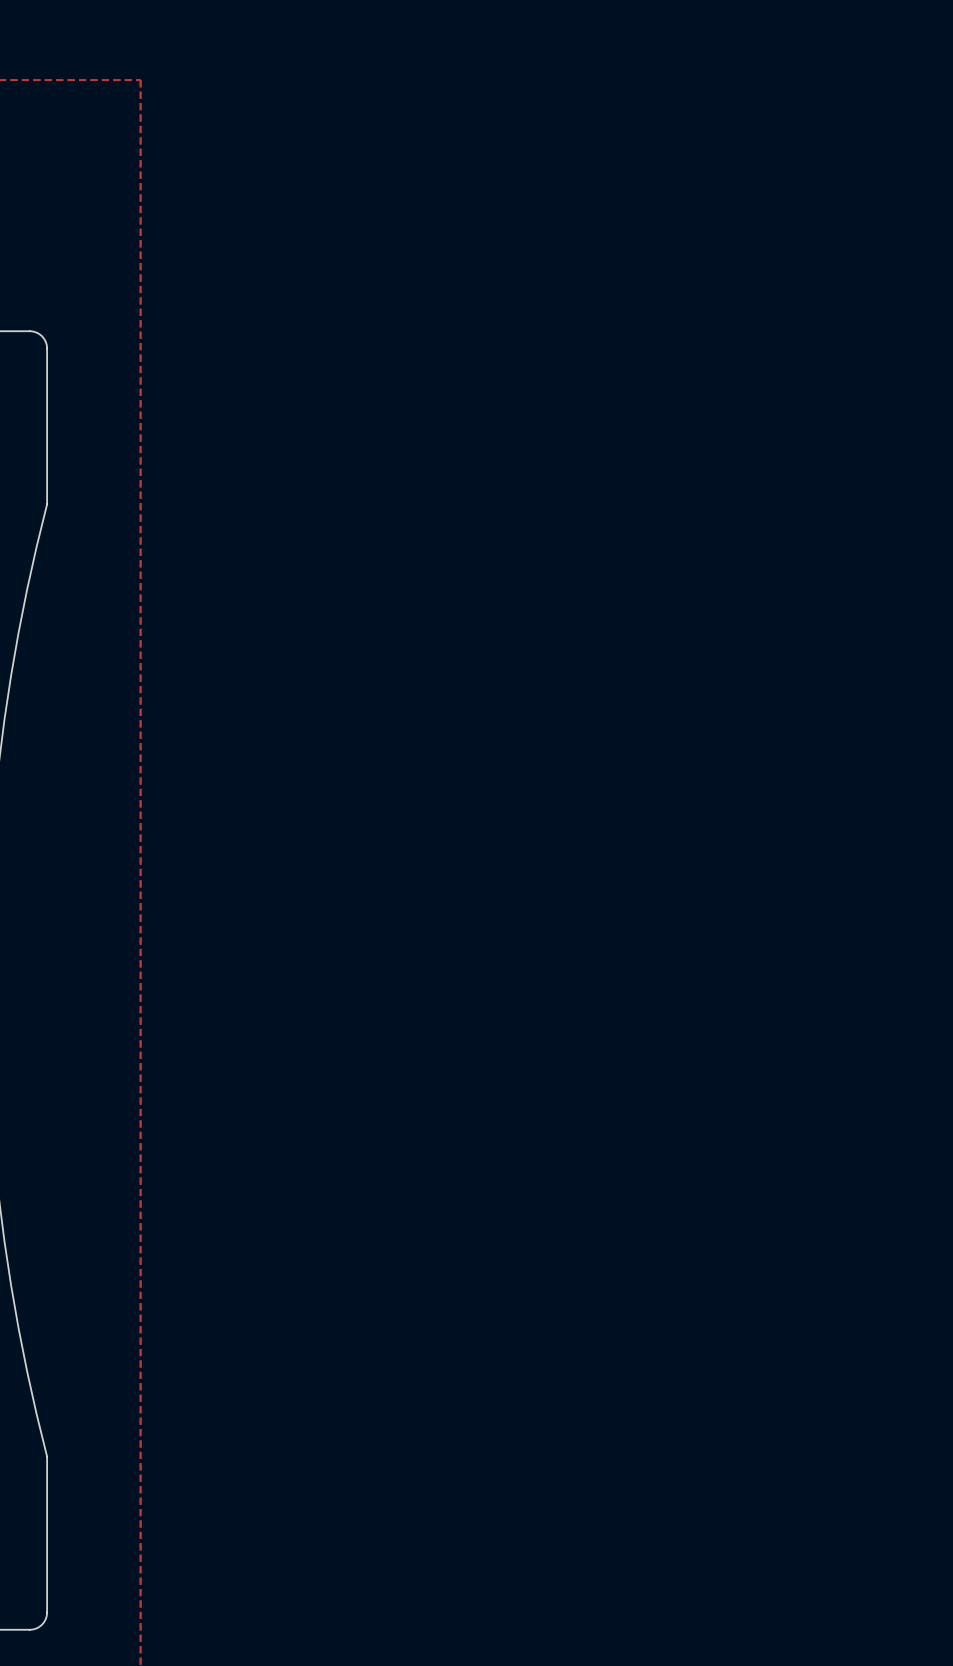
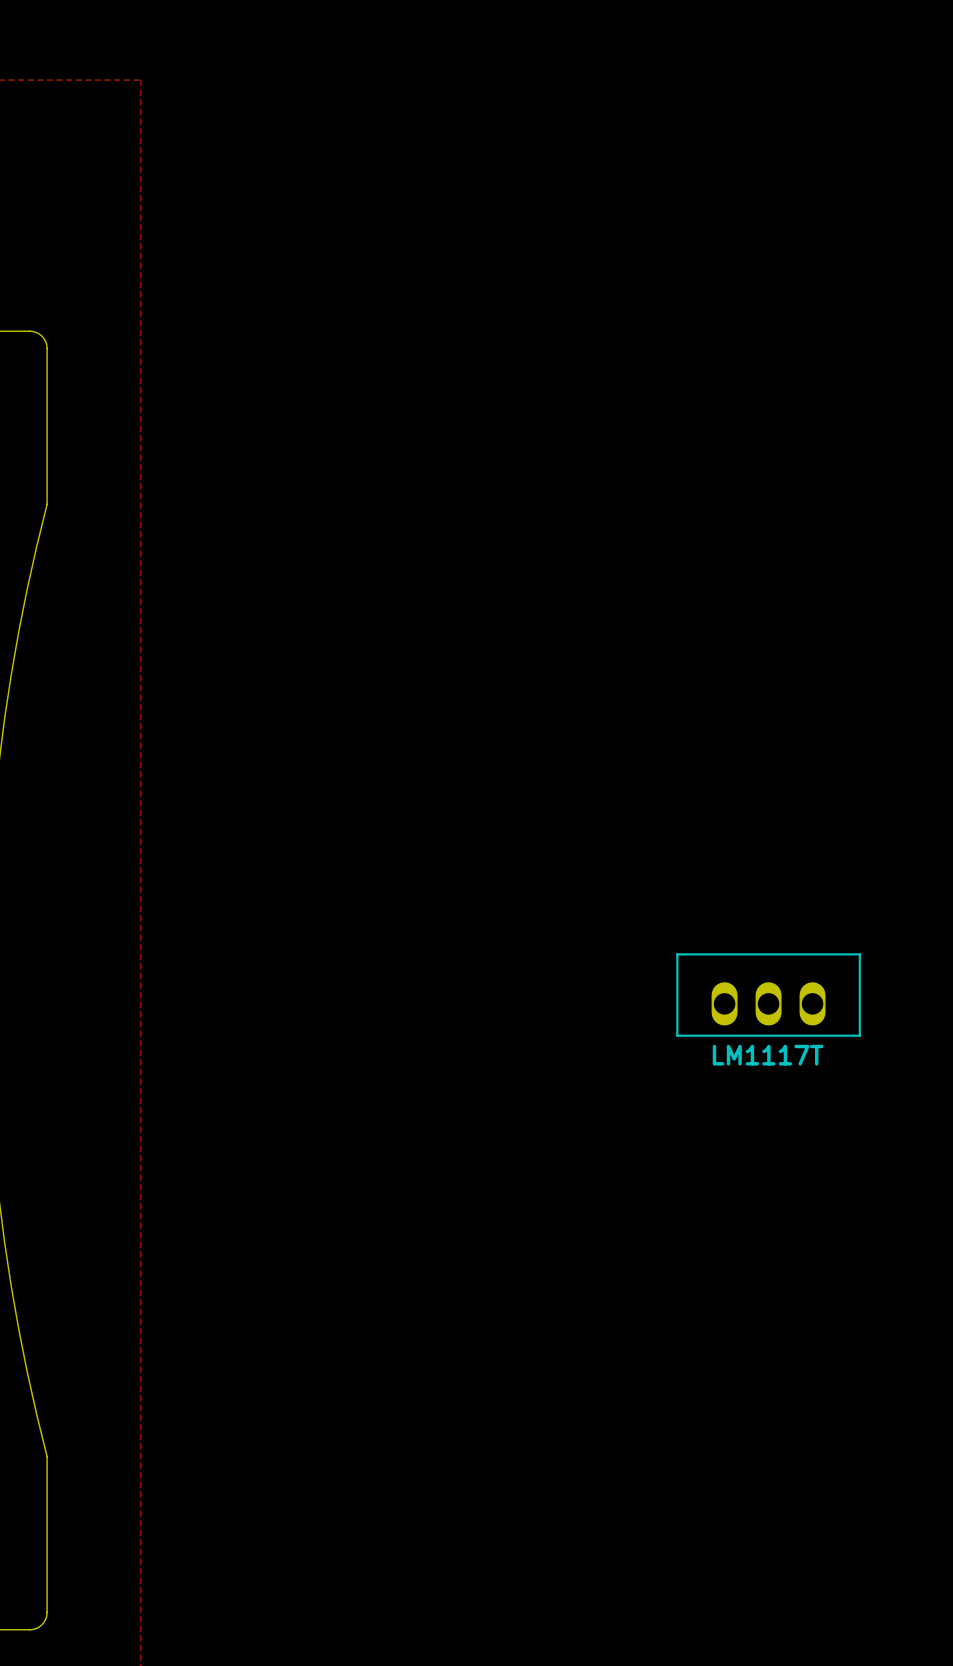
part: none -> LM1117T (768, 995)

